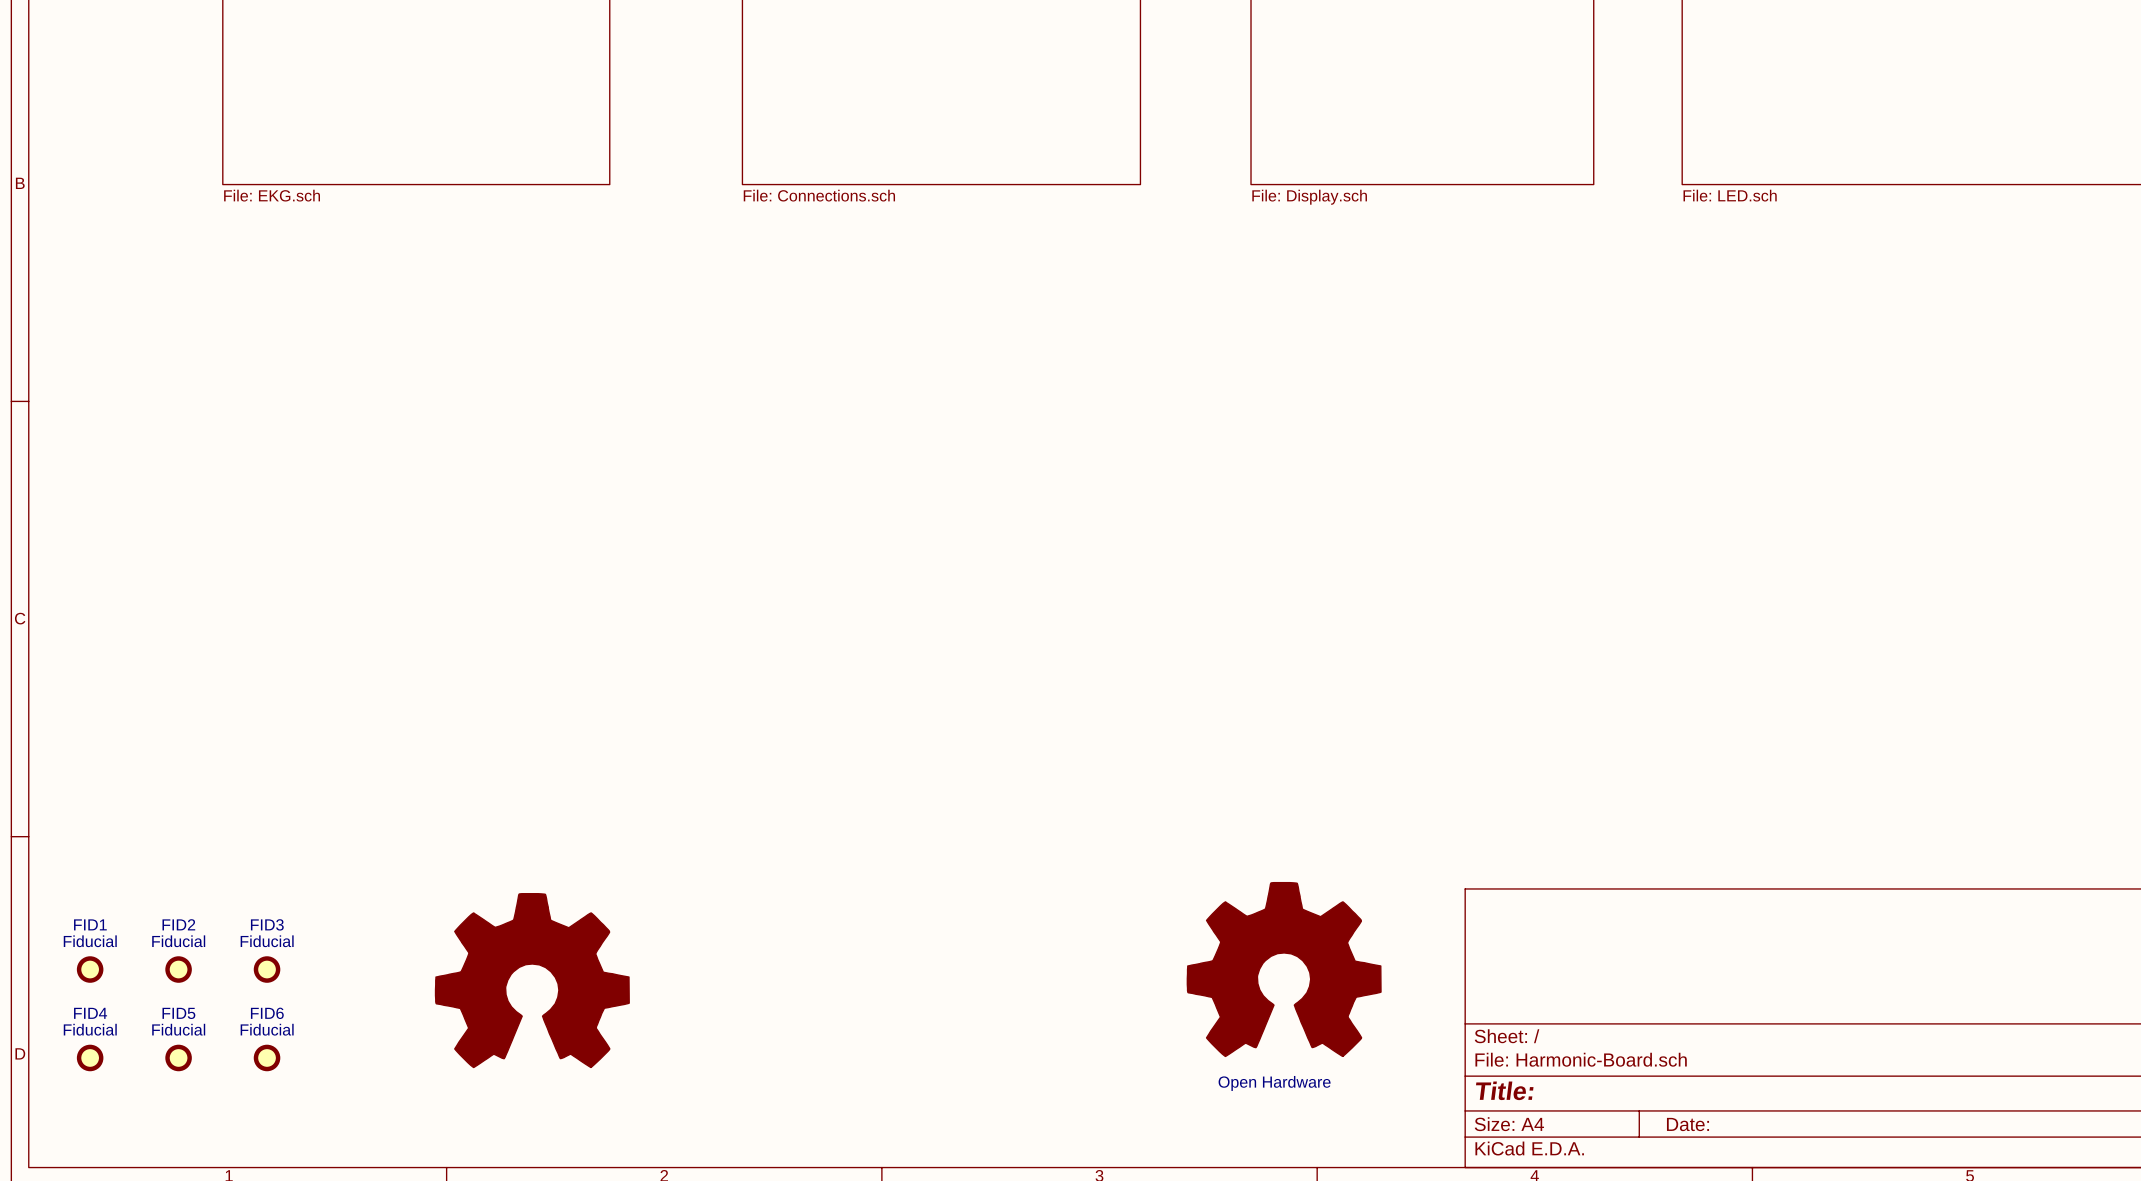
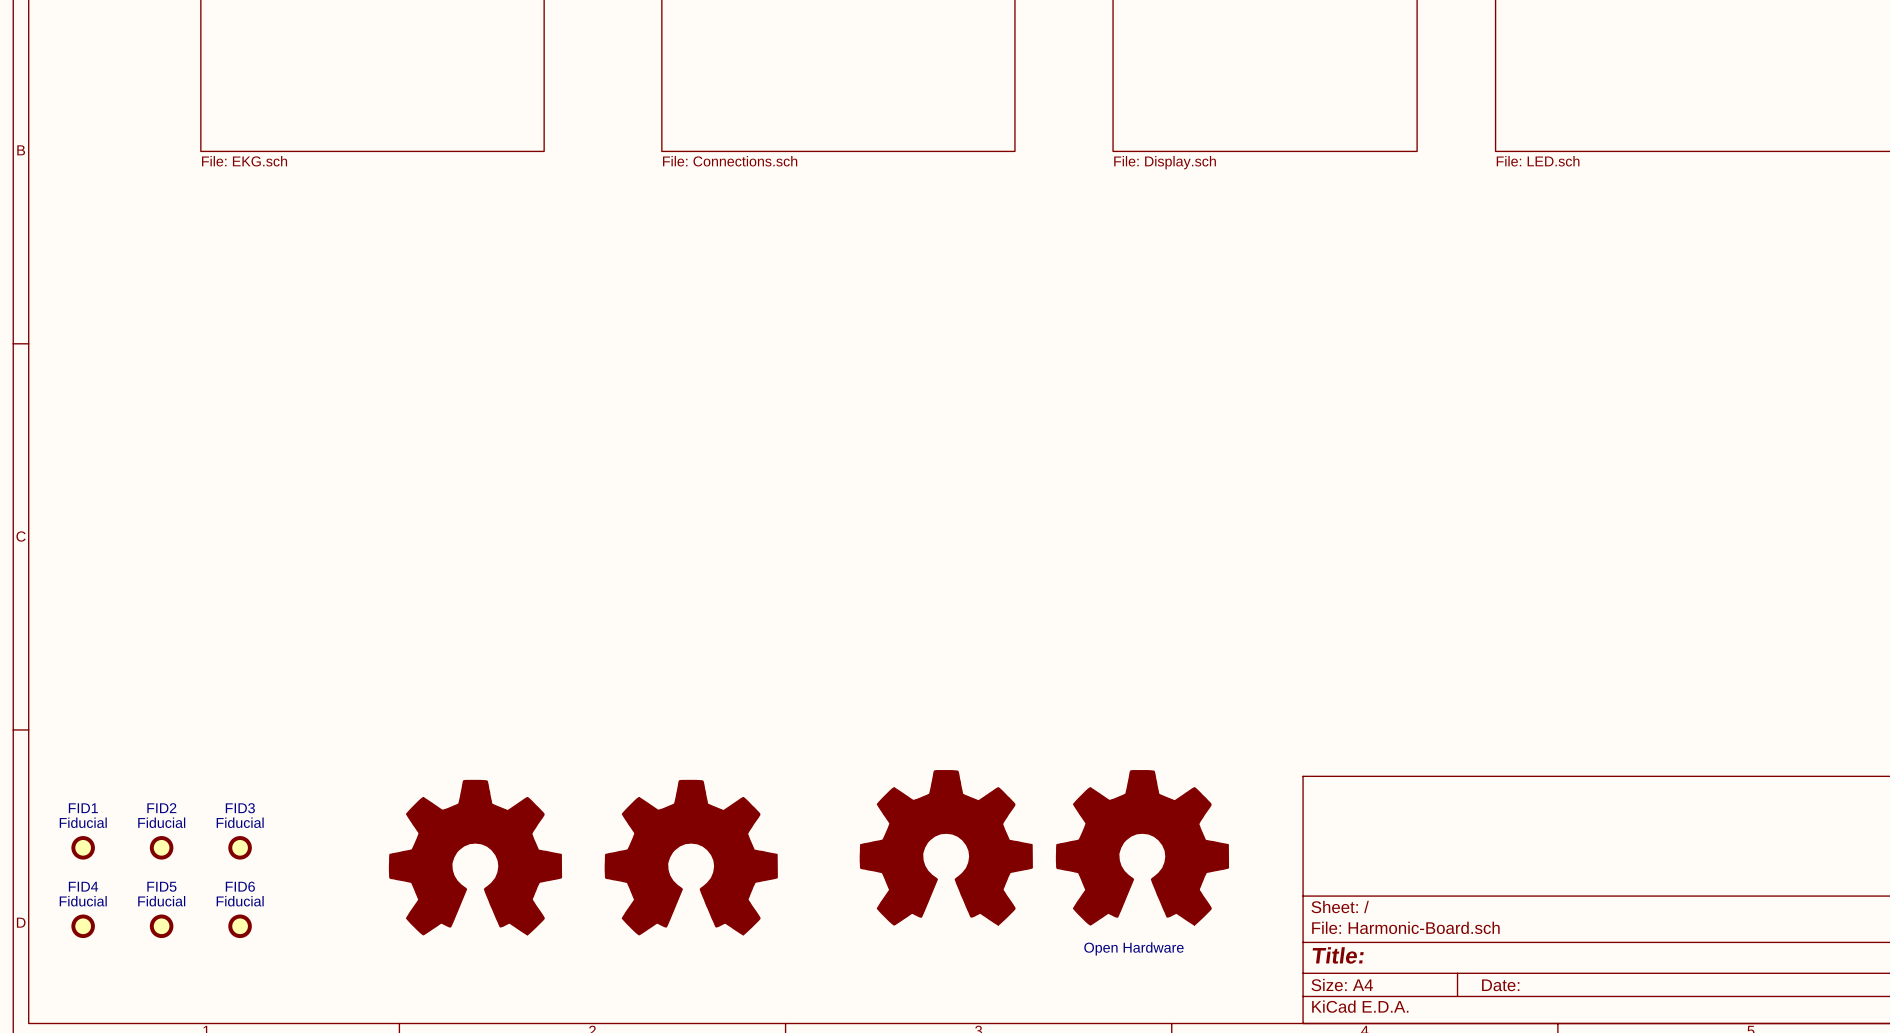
part: none -> (946, 847)
part: none -> (691, 857)

